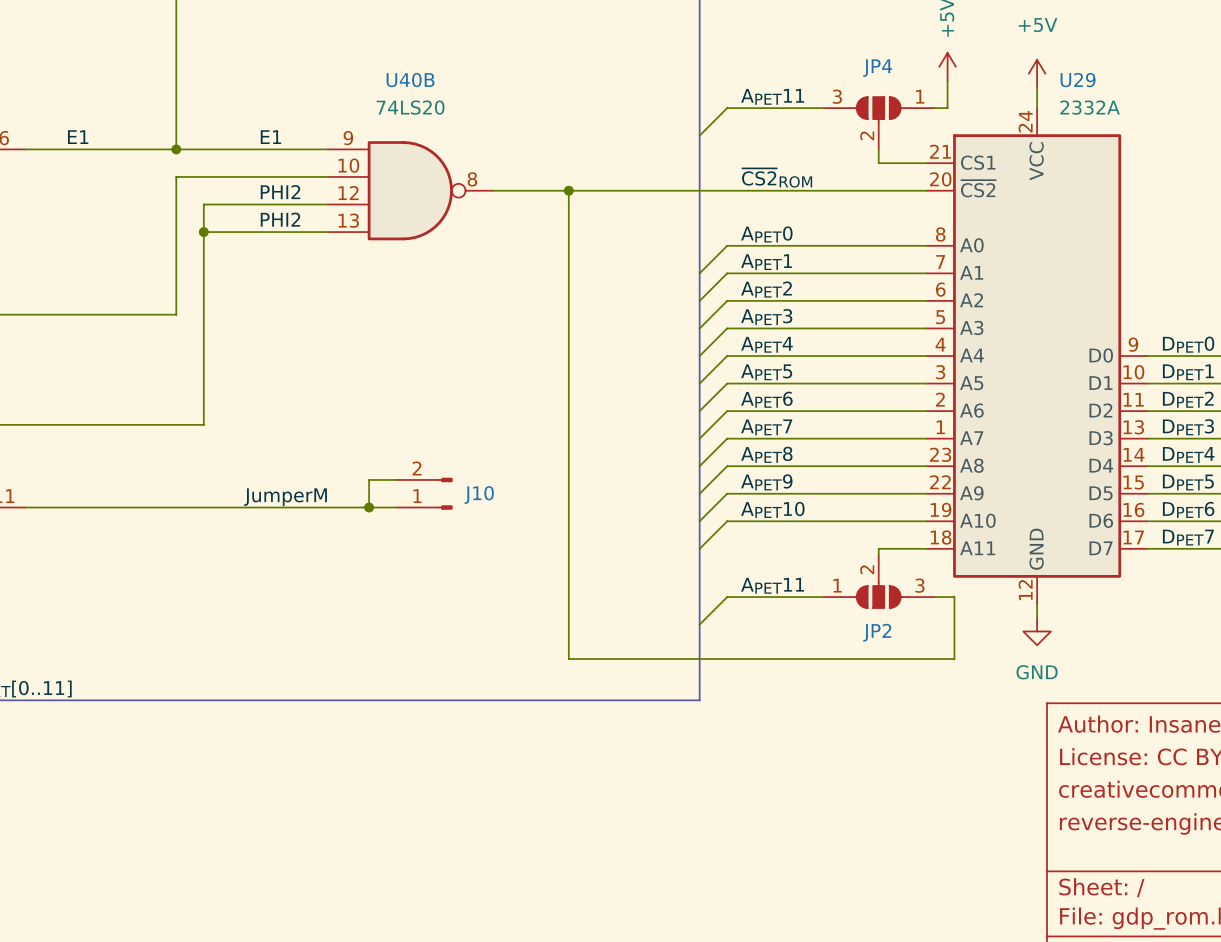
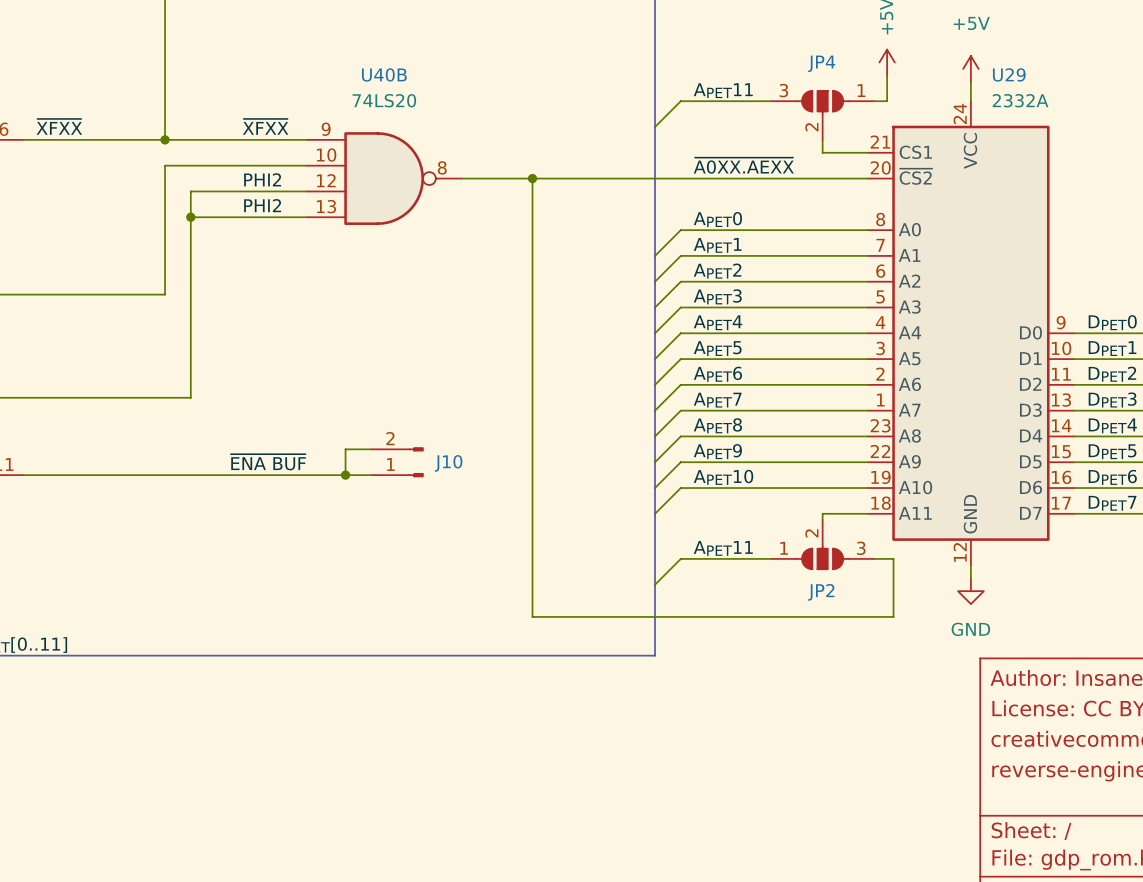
label: none -> ~{XFXX} (59, 126)
label: E1 (78, 137) -> none
label: E1 (270, 137) -> ~{XFXX} (265, 126)
label: ~{CS2}ROM (777, 178) -> ~{A0XX.AEXX} (743, 165)
label: JumperM (285, 497) -> ~{ENA BUF} (268, 462)

